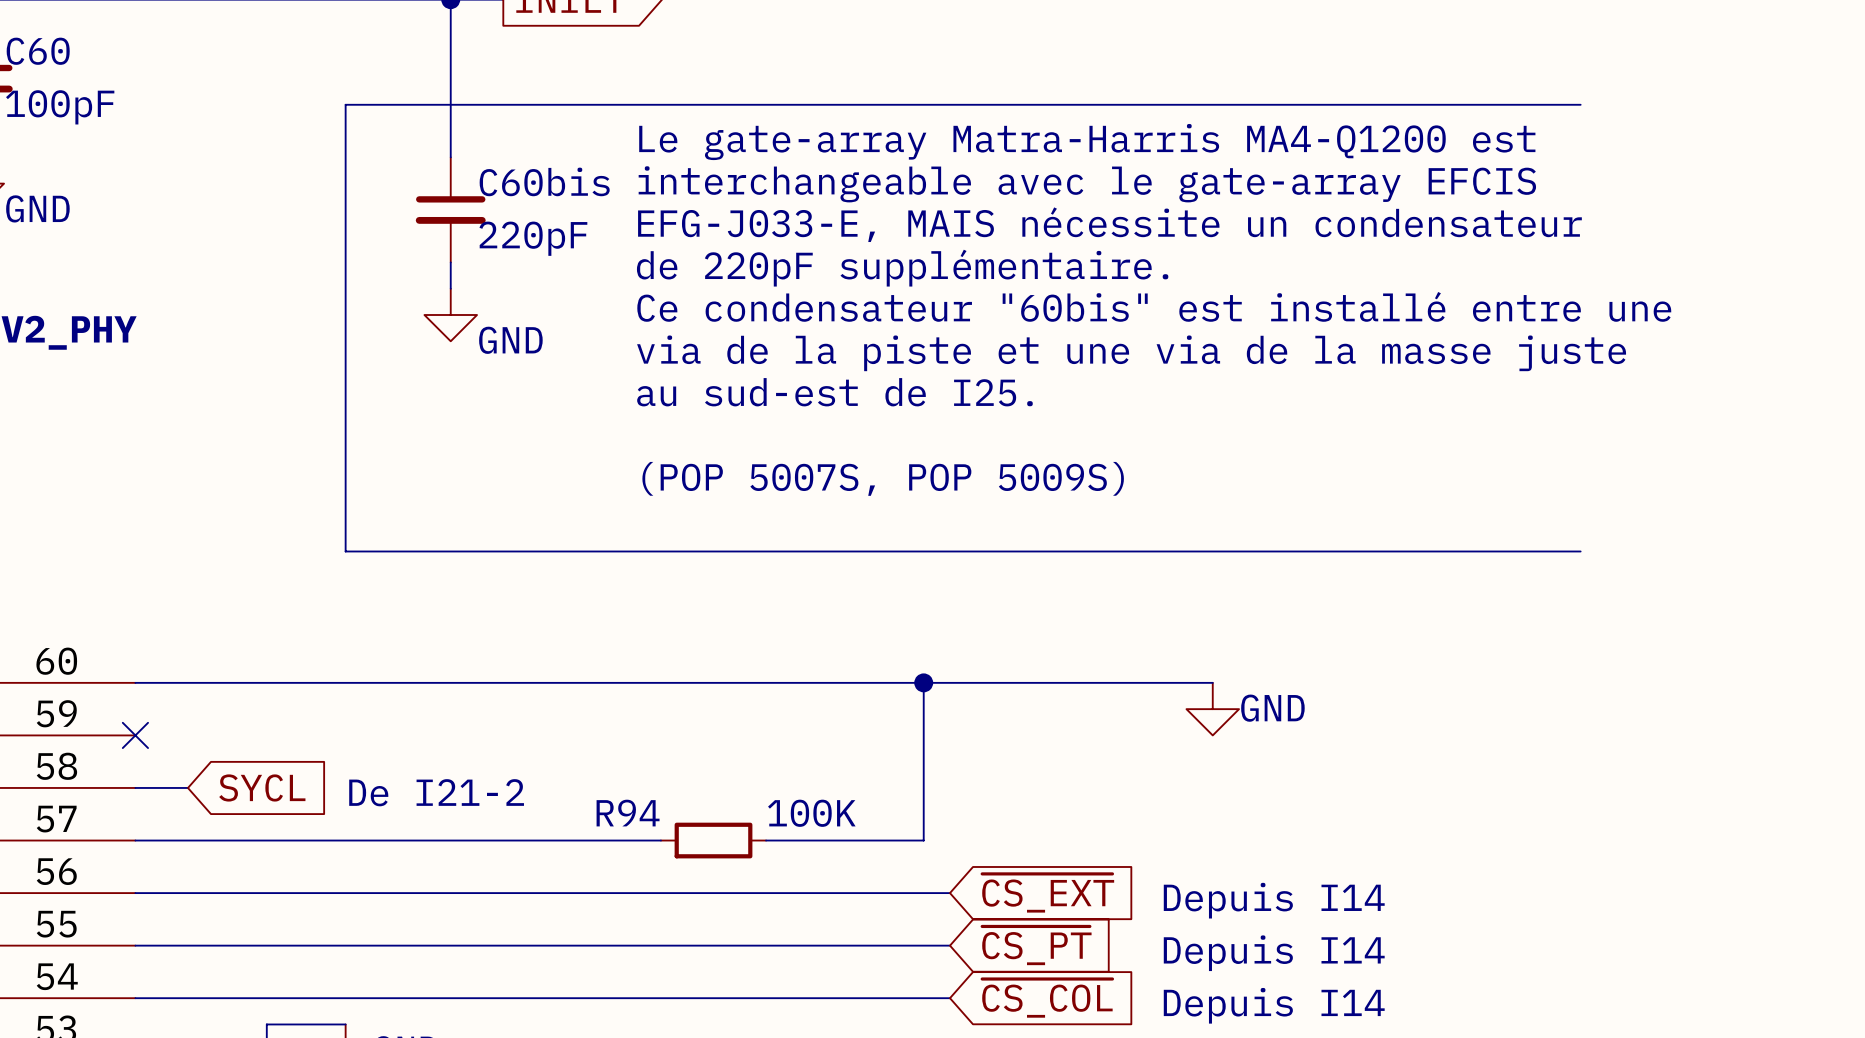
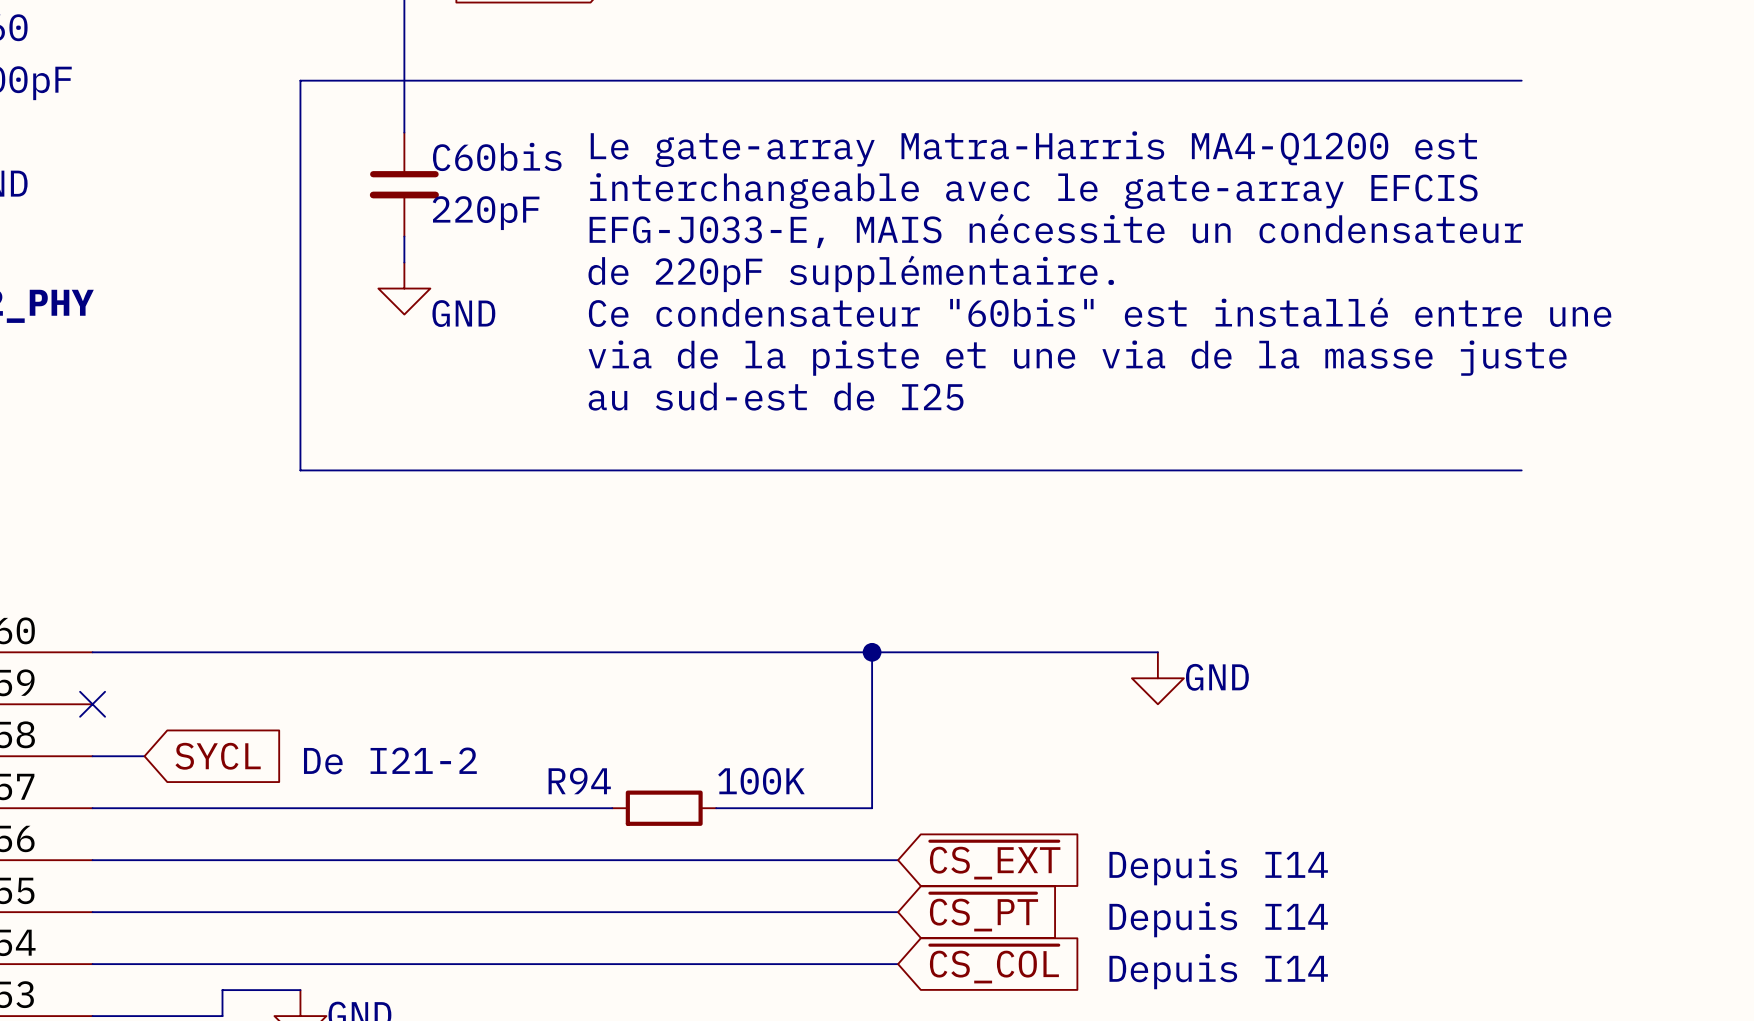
text position: Le gate-array Matra-Harris MA4-Q1200 est (1087, 142) -> Le gate-array Matra-Harris MA4-Q1200 est (1033, 149)
text position: interchangeable avec le gate-array EFCIS (1087, 184) -> interchangeable avec le gate-array EFCIS (1033, 191)
text position: EFG-J033-E, MAIS nécessite un condensateur (1109, 224) -> EFG-J033-E, MAIS nécessite un condensateur (1056, 230)
text position: de 220pF supplémentaire. (902, 268) -> de 220pF supplémentaire. (851, 273)
text position: Ce condensateur "60bis" est installé entre une (1154, 306) -> Ce condensateur "60bis" est installé entre une (1100, 312)
text position: via de la piste et une via de la masse juste (1131, 353) -> via de la piste et une via de la masse juste (1077, 358)
text: au sud-est de I25. (834, 392) -> au sud-est de I25 (776, 396)
text: (POP 5007S, POP 5009S) (883, 478) -> none
line: (345, 498) (345, 551) (1580, 551) -> (300, 470) (1521, 470)

